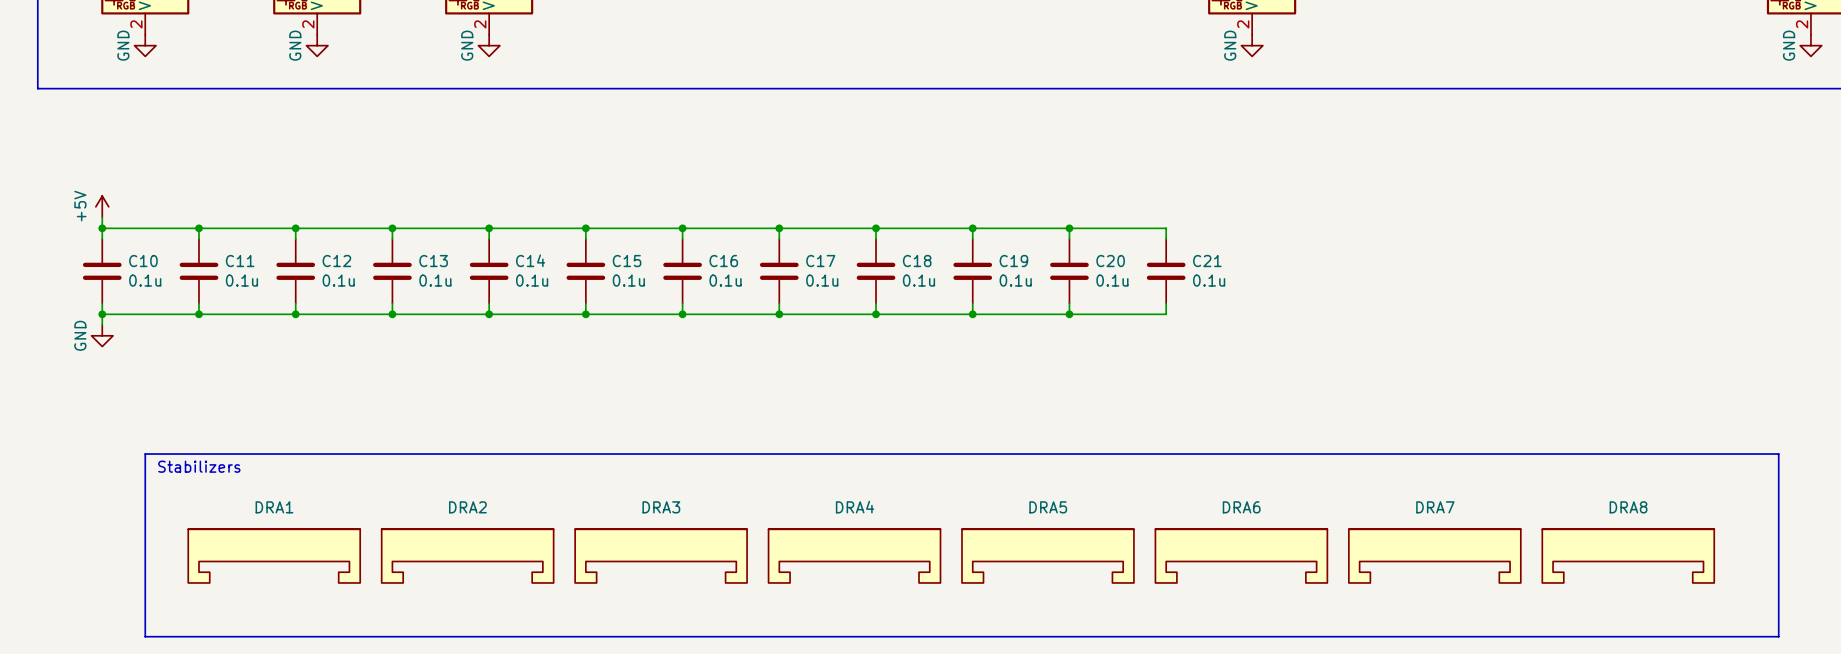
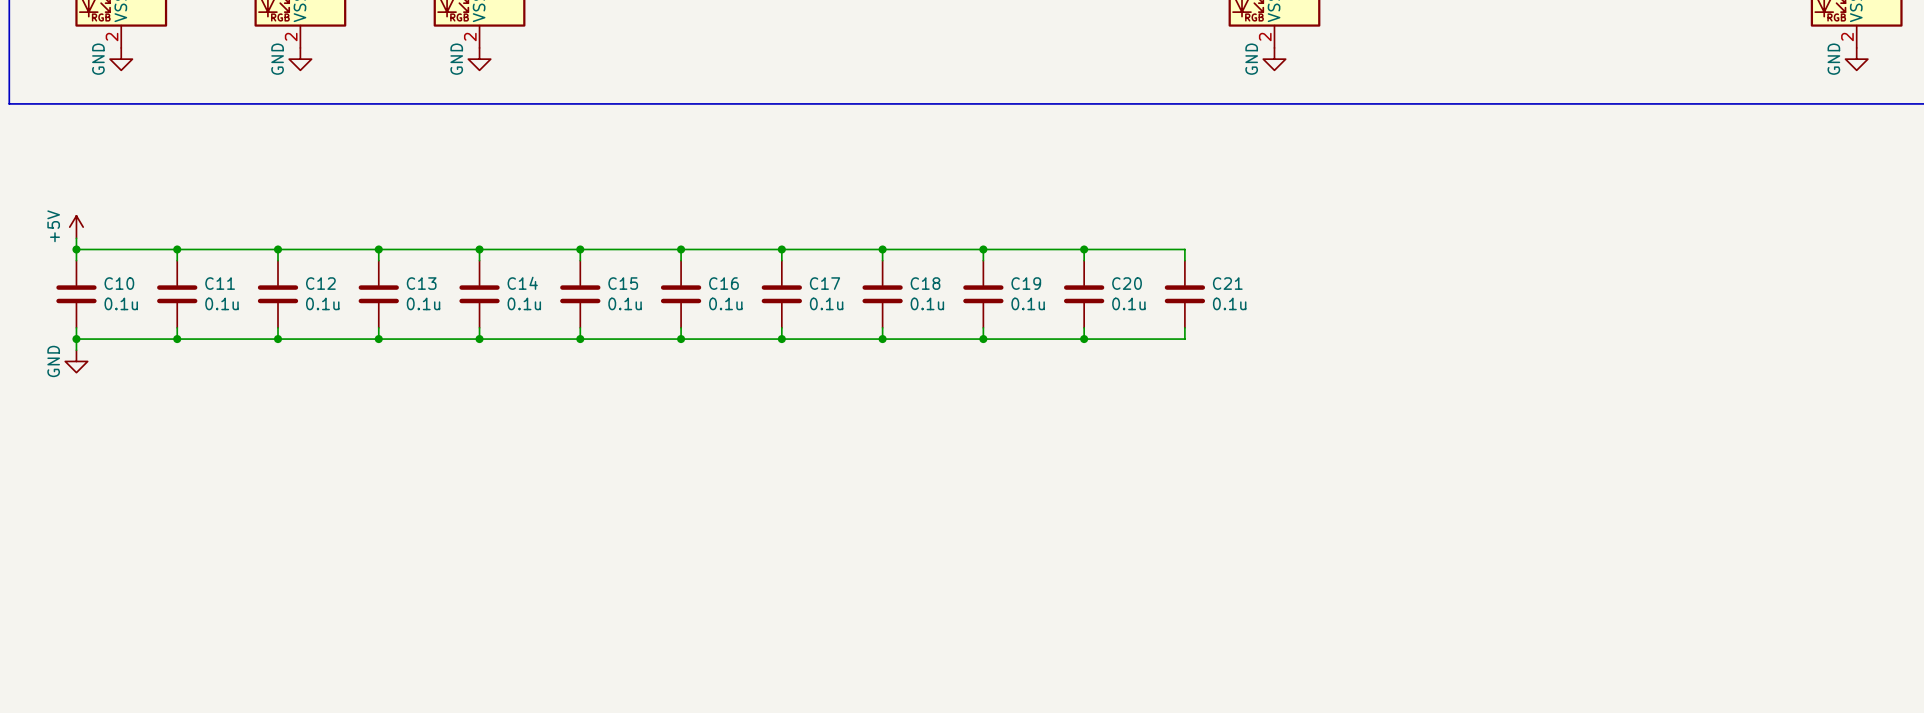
line: (145, 454) (145, 636) (1778, 636) (1778, 454) (145, 454) -> none
text: Stabilizers (199, 466) -> none
DRA1: (274, 556) -> none
DRA2: (467, 556) -> none
DRA3: (661, 556) -> none
DRA4: (854, 556) -> none
DRA5: (1047, 556) -> none
DRA6: (1241, 556) -> none
DRA7: (1434, 556) -> none
DRA8: (1628, 556) -> none

